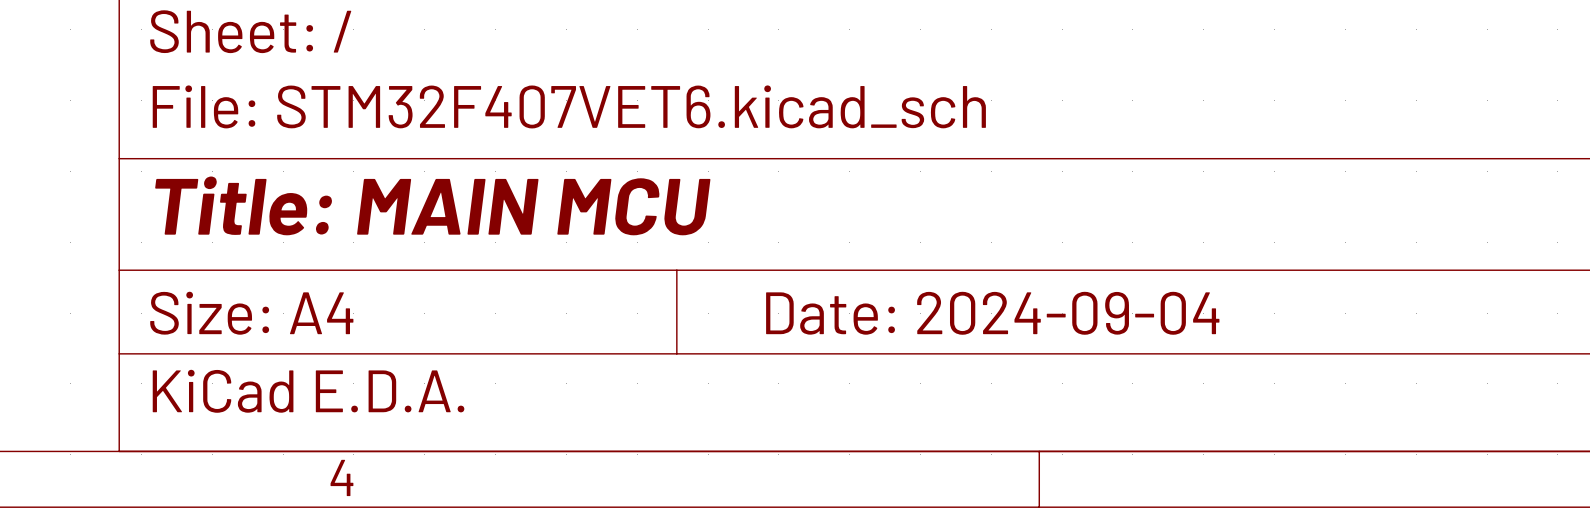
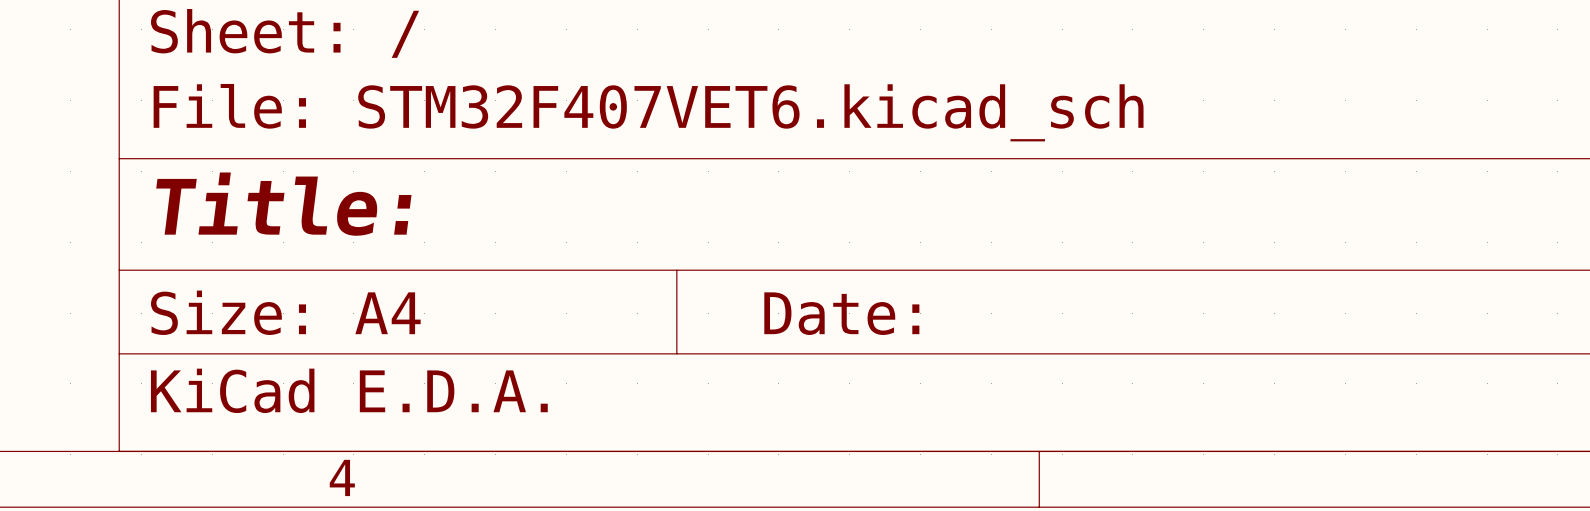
title block: Title: MAIN MCU (432, 205) -> Title: (283, 204)
title block: Date: 2024-09-04 (992, 313) -> Date: (841, 313)

